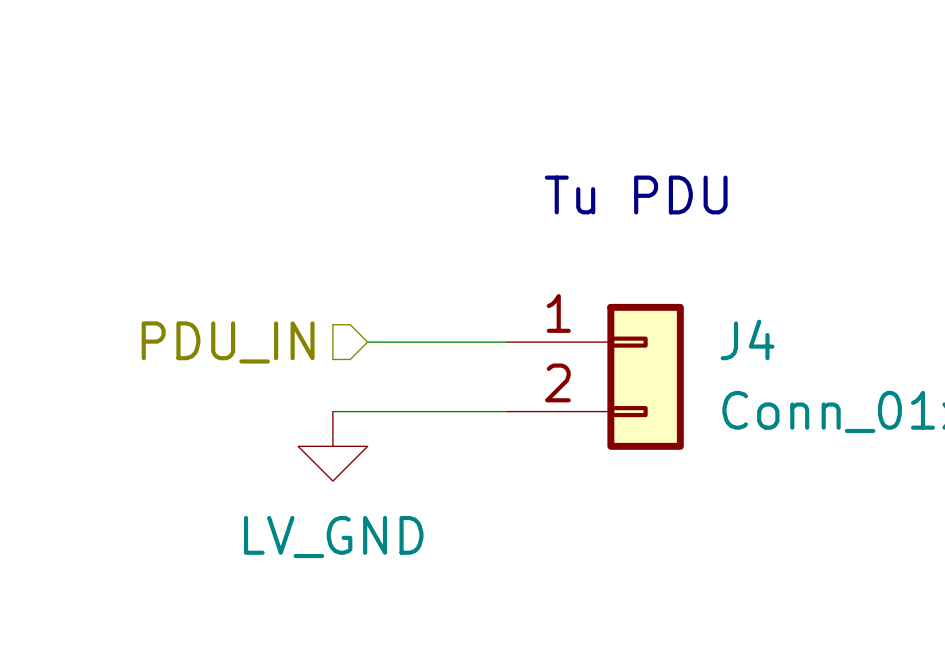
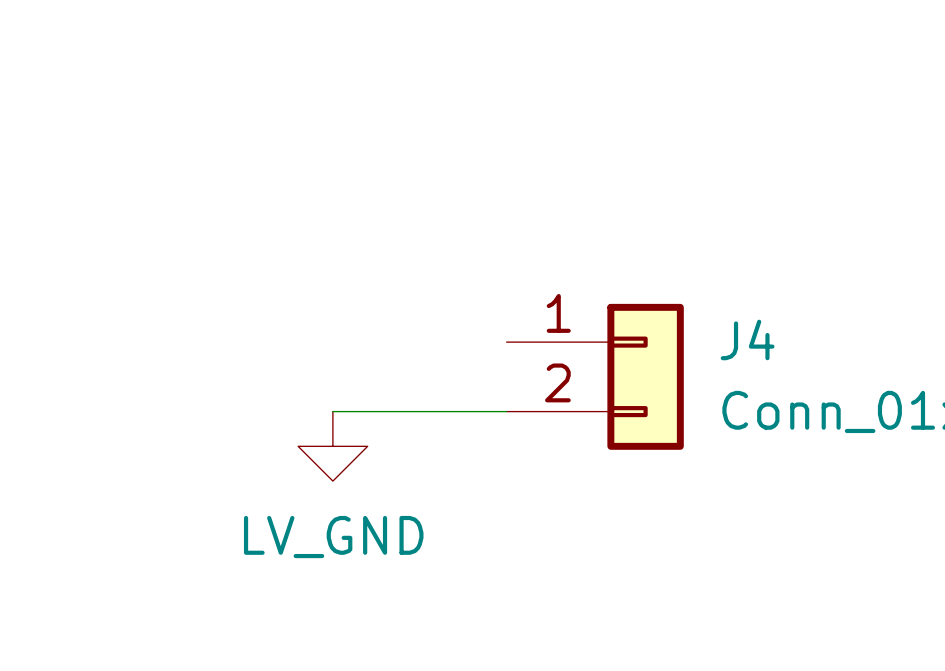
text: Tu PDU (636, 194) -> none
hierarchical label: PDU_IN (228, 342) -> none
wire: (367, 342) (506, 342) -> none

